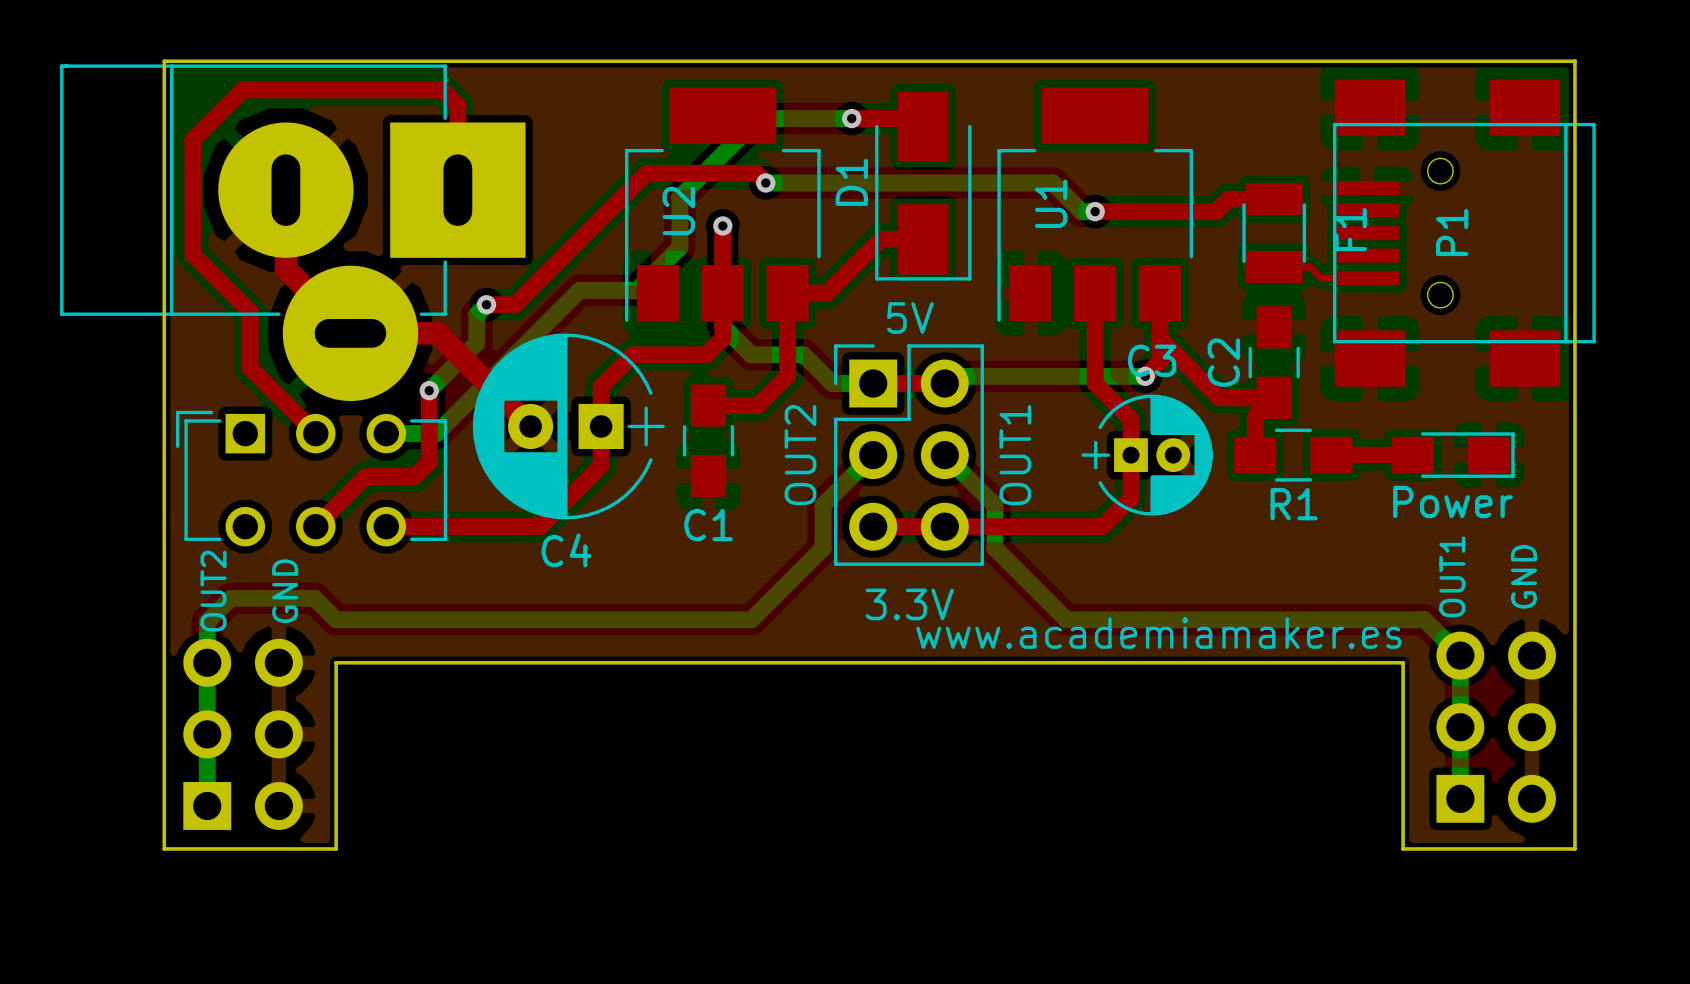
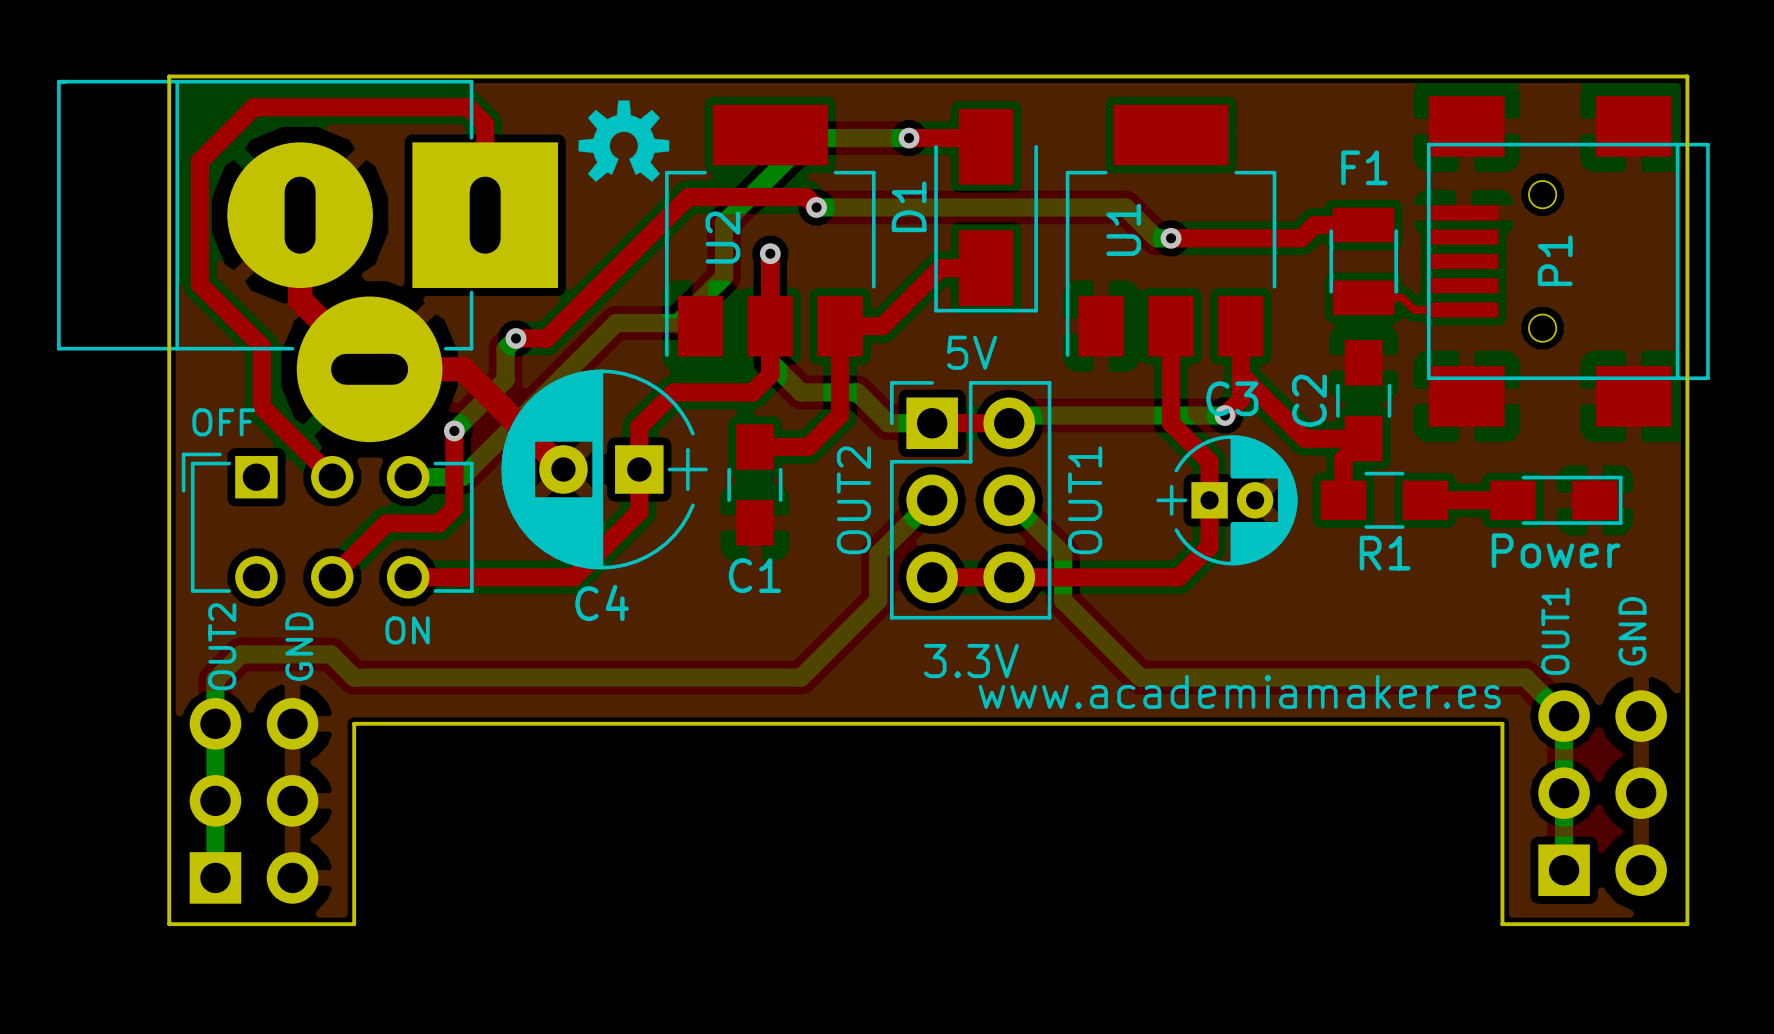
drawing: none -> [578, 100, 670, 182]
F1 name rotation: 0° (1350, 229) -> 90° clockwise (1364, 167)
F1 name position: F1 (1350, 229) -> F1 (1364, 167)
text: none -> OFF (223, 422)
text: none -> ON (407, 630)

